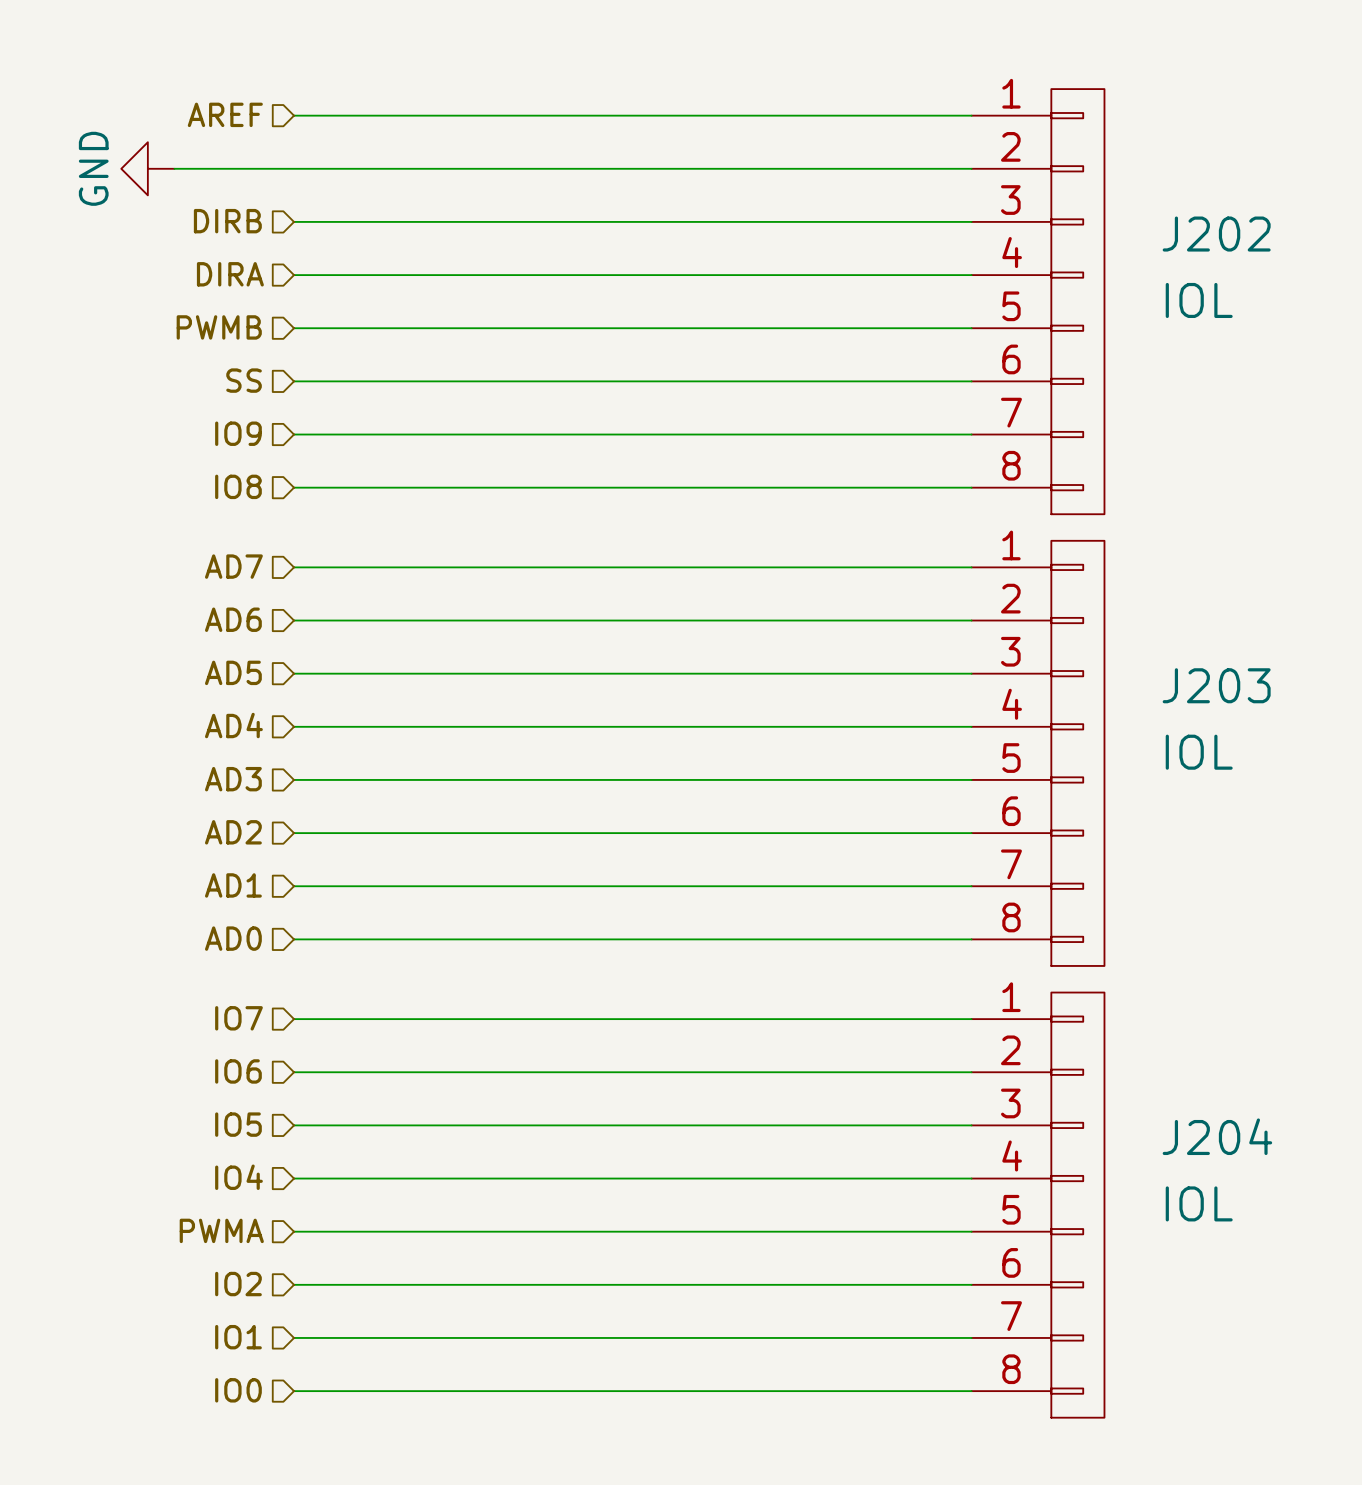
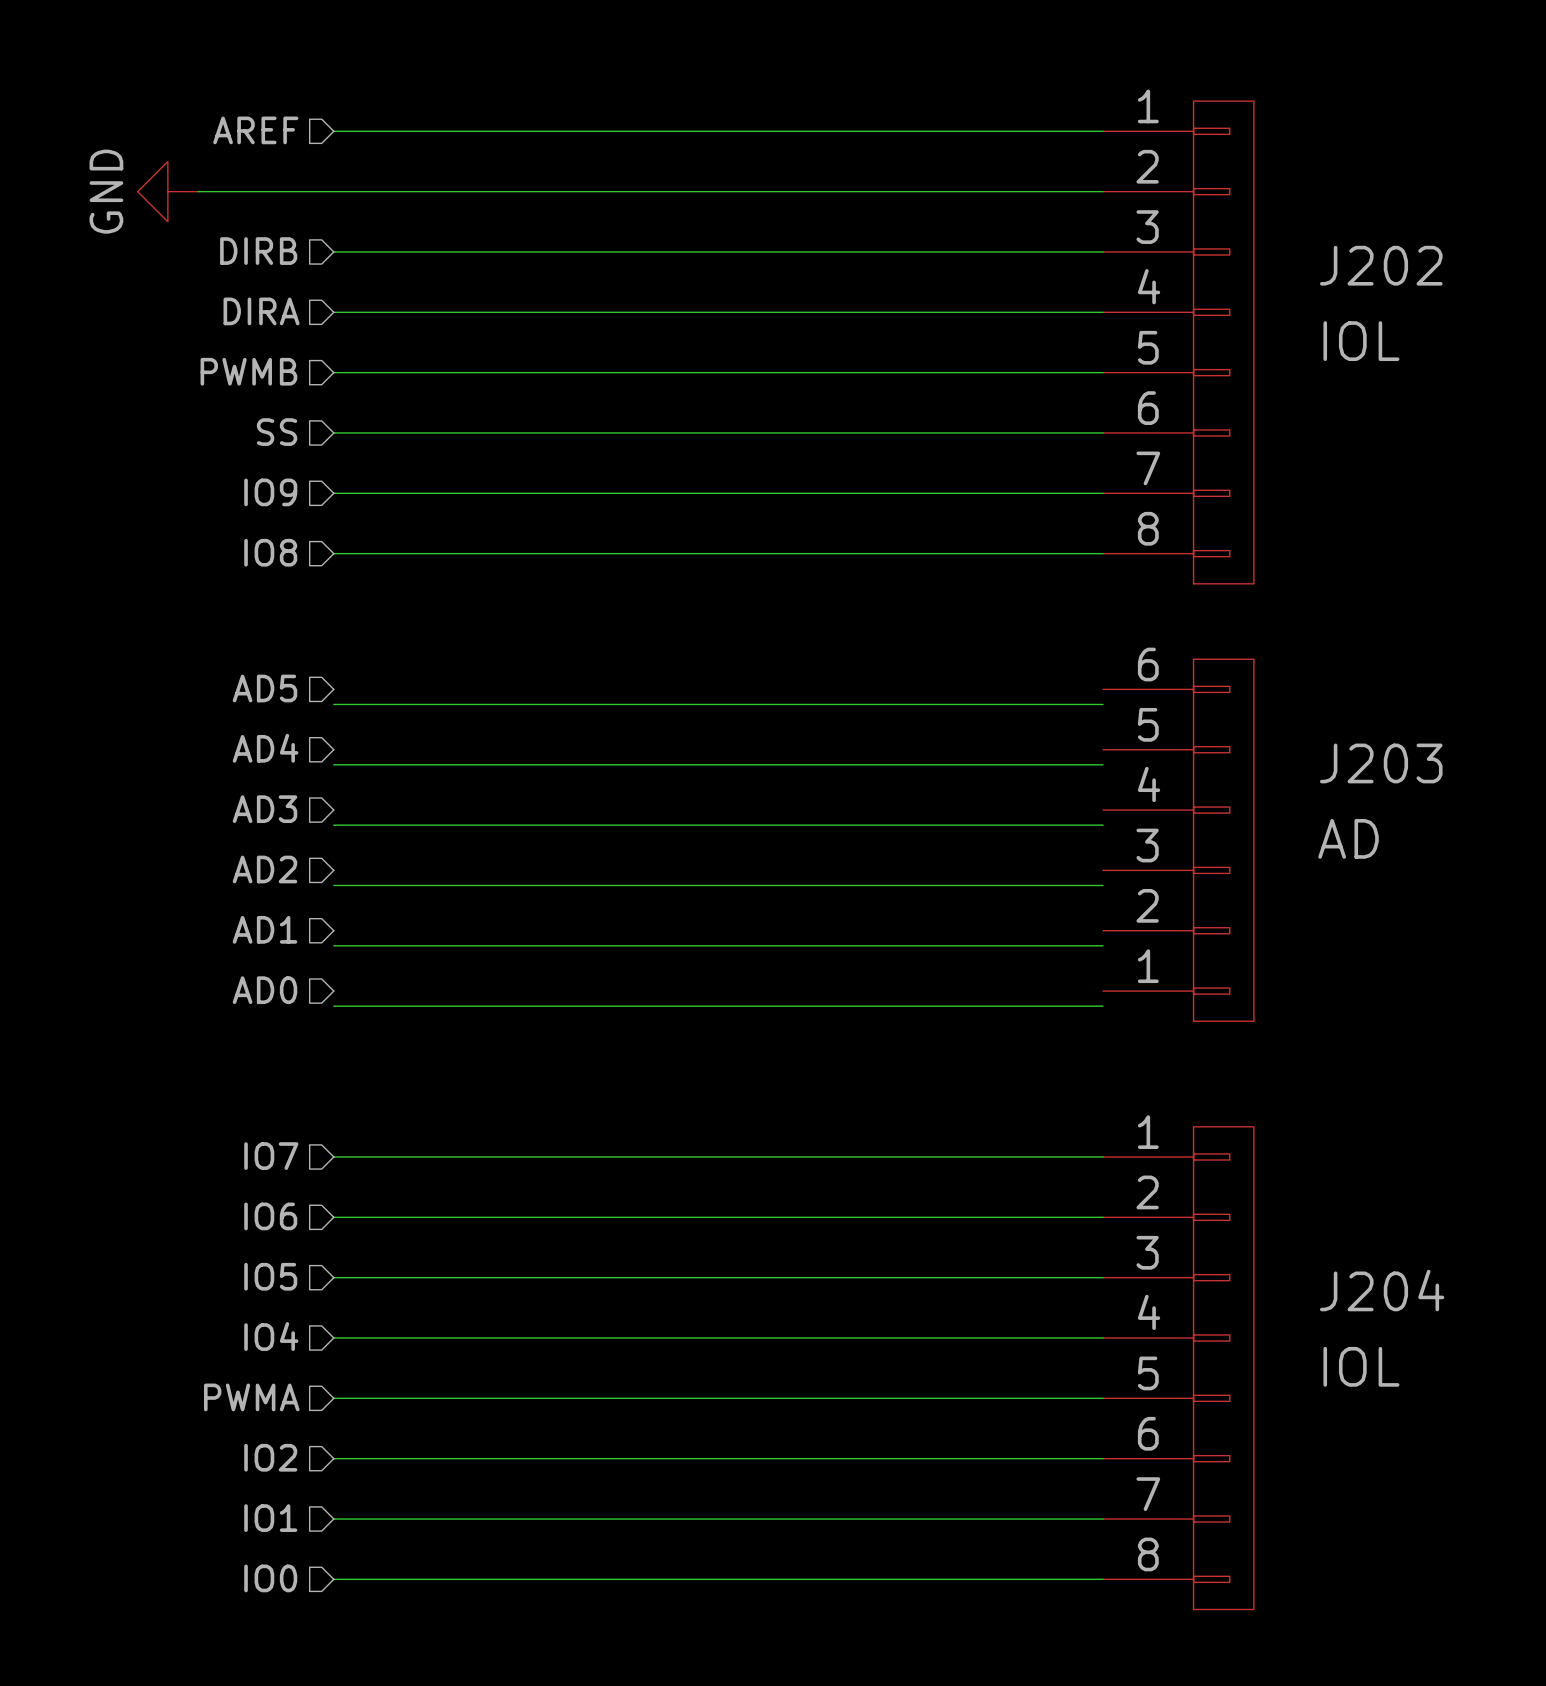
J203 symbol: [971, 540, 1105, 966] -> [1103, 659, 1254, 1022]
hierarchical label: AD7 (233, 566) -> none
wire: (294, 567) (971, 567) -> none
hierarchical label: AD6 (233, 619) -> none
hierarchical label position: AD5 (233, 672) -> AD5 (264, 688)
hierarchical label position: AD4 (233, 725) -> AD4 (265, 748)
J203 value: IOL (1199, 752) -> AD (1348, 838)
hierarchical label position: AD3 (233, 779) -> AD3 (264, 809)
hierarchical label position: AD2 (233, 832) -> AD2 (264, 869)
hierarchical label position: AD1 (233, 885) -> AD1 (264, 929)
hierarchical label position: AD0 (233, 938) -> AD0 (264, 990)
wire: (294, 939) (971, 939) -> none

